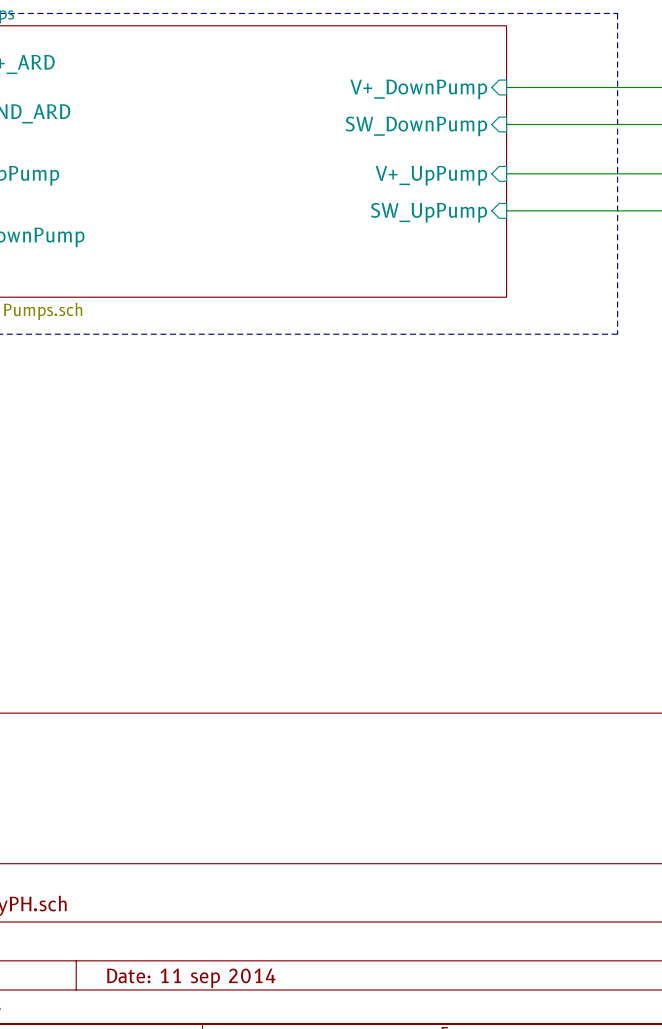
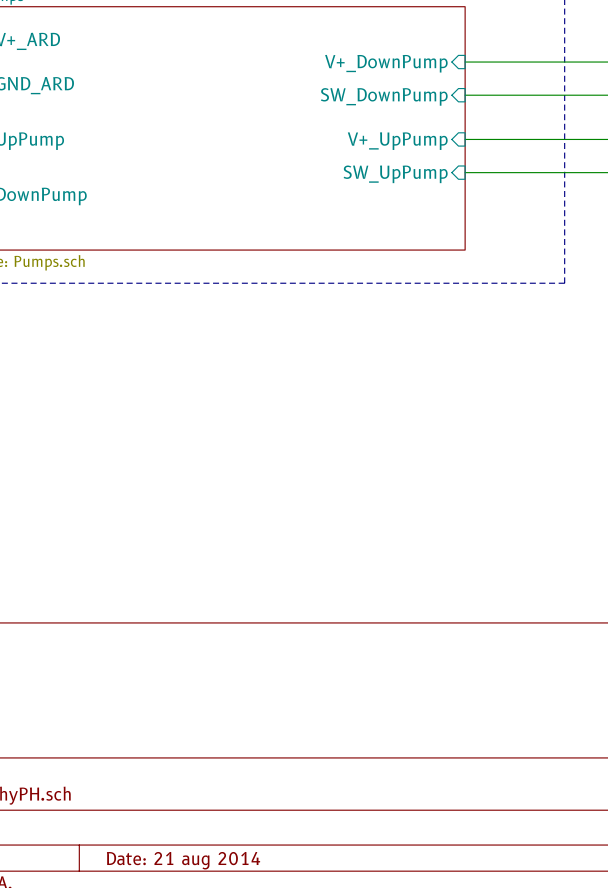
title block: Date: 11 sep 2014 (191, 978) -> Date: 21 aug 2014 (183, 860)

